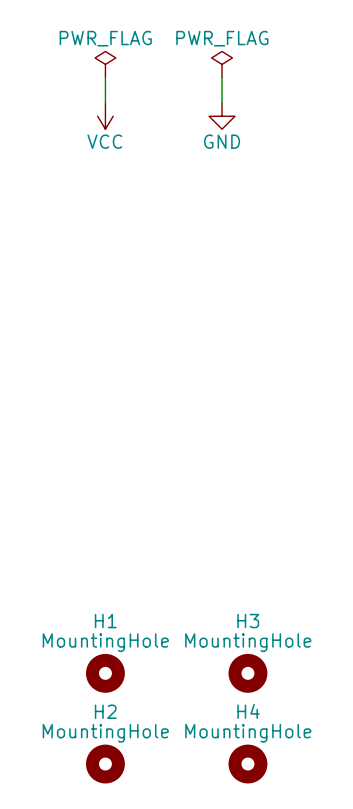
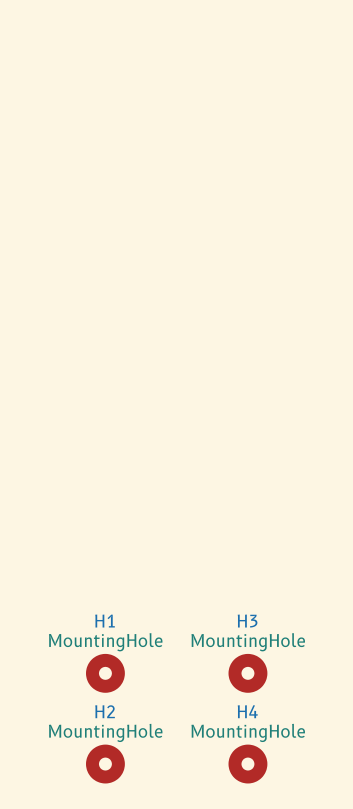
power symbol: PWR_FLAG (105, 64) -> none
power symbol: PWR_FLAG (222, 64) -> none
wire: (105, 77) (105, 103) -> none
wire: (222, 77) (222, 103) -> none
power symbol: VCC (105, 116) -> none
power symbol: GND (222, 116) -> none

